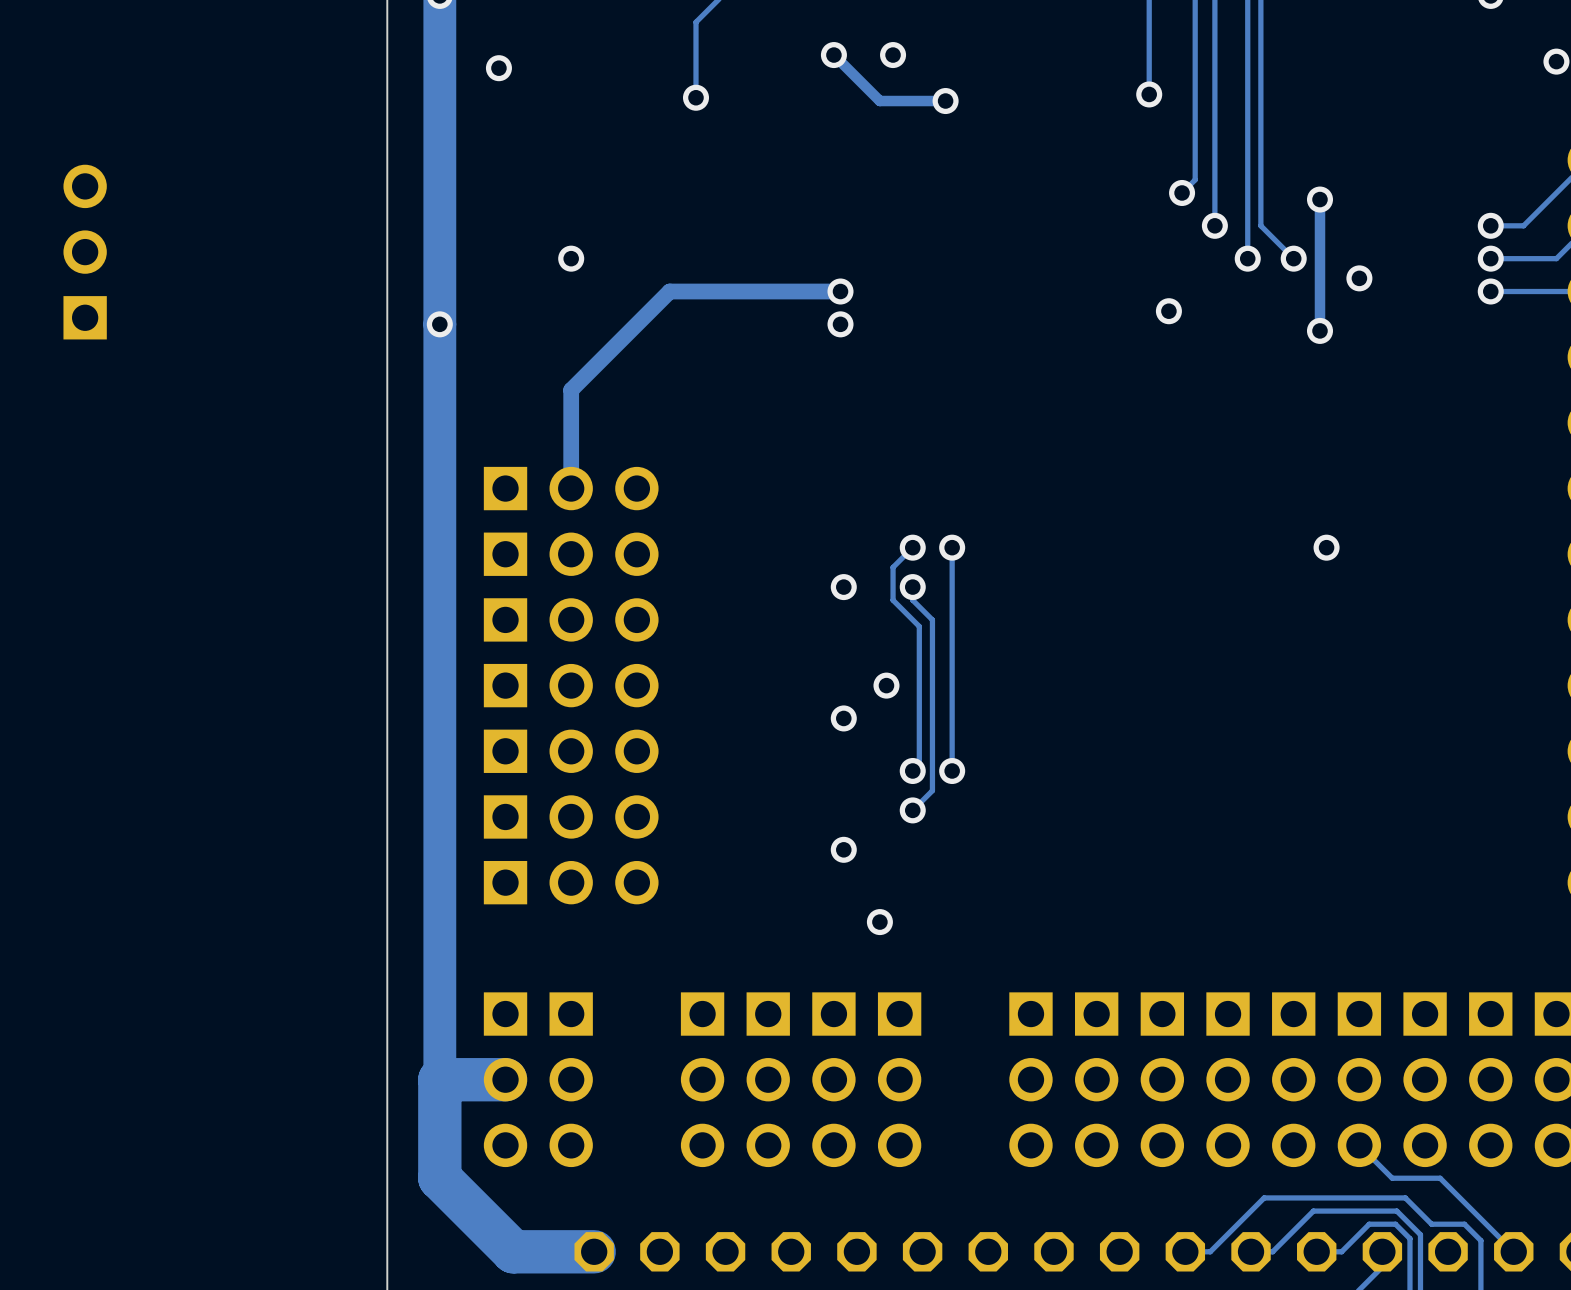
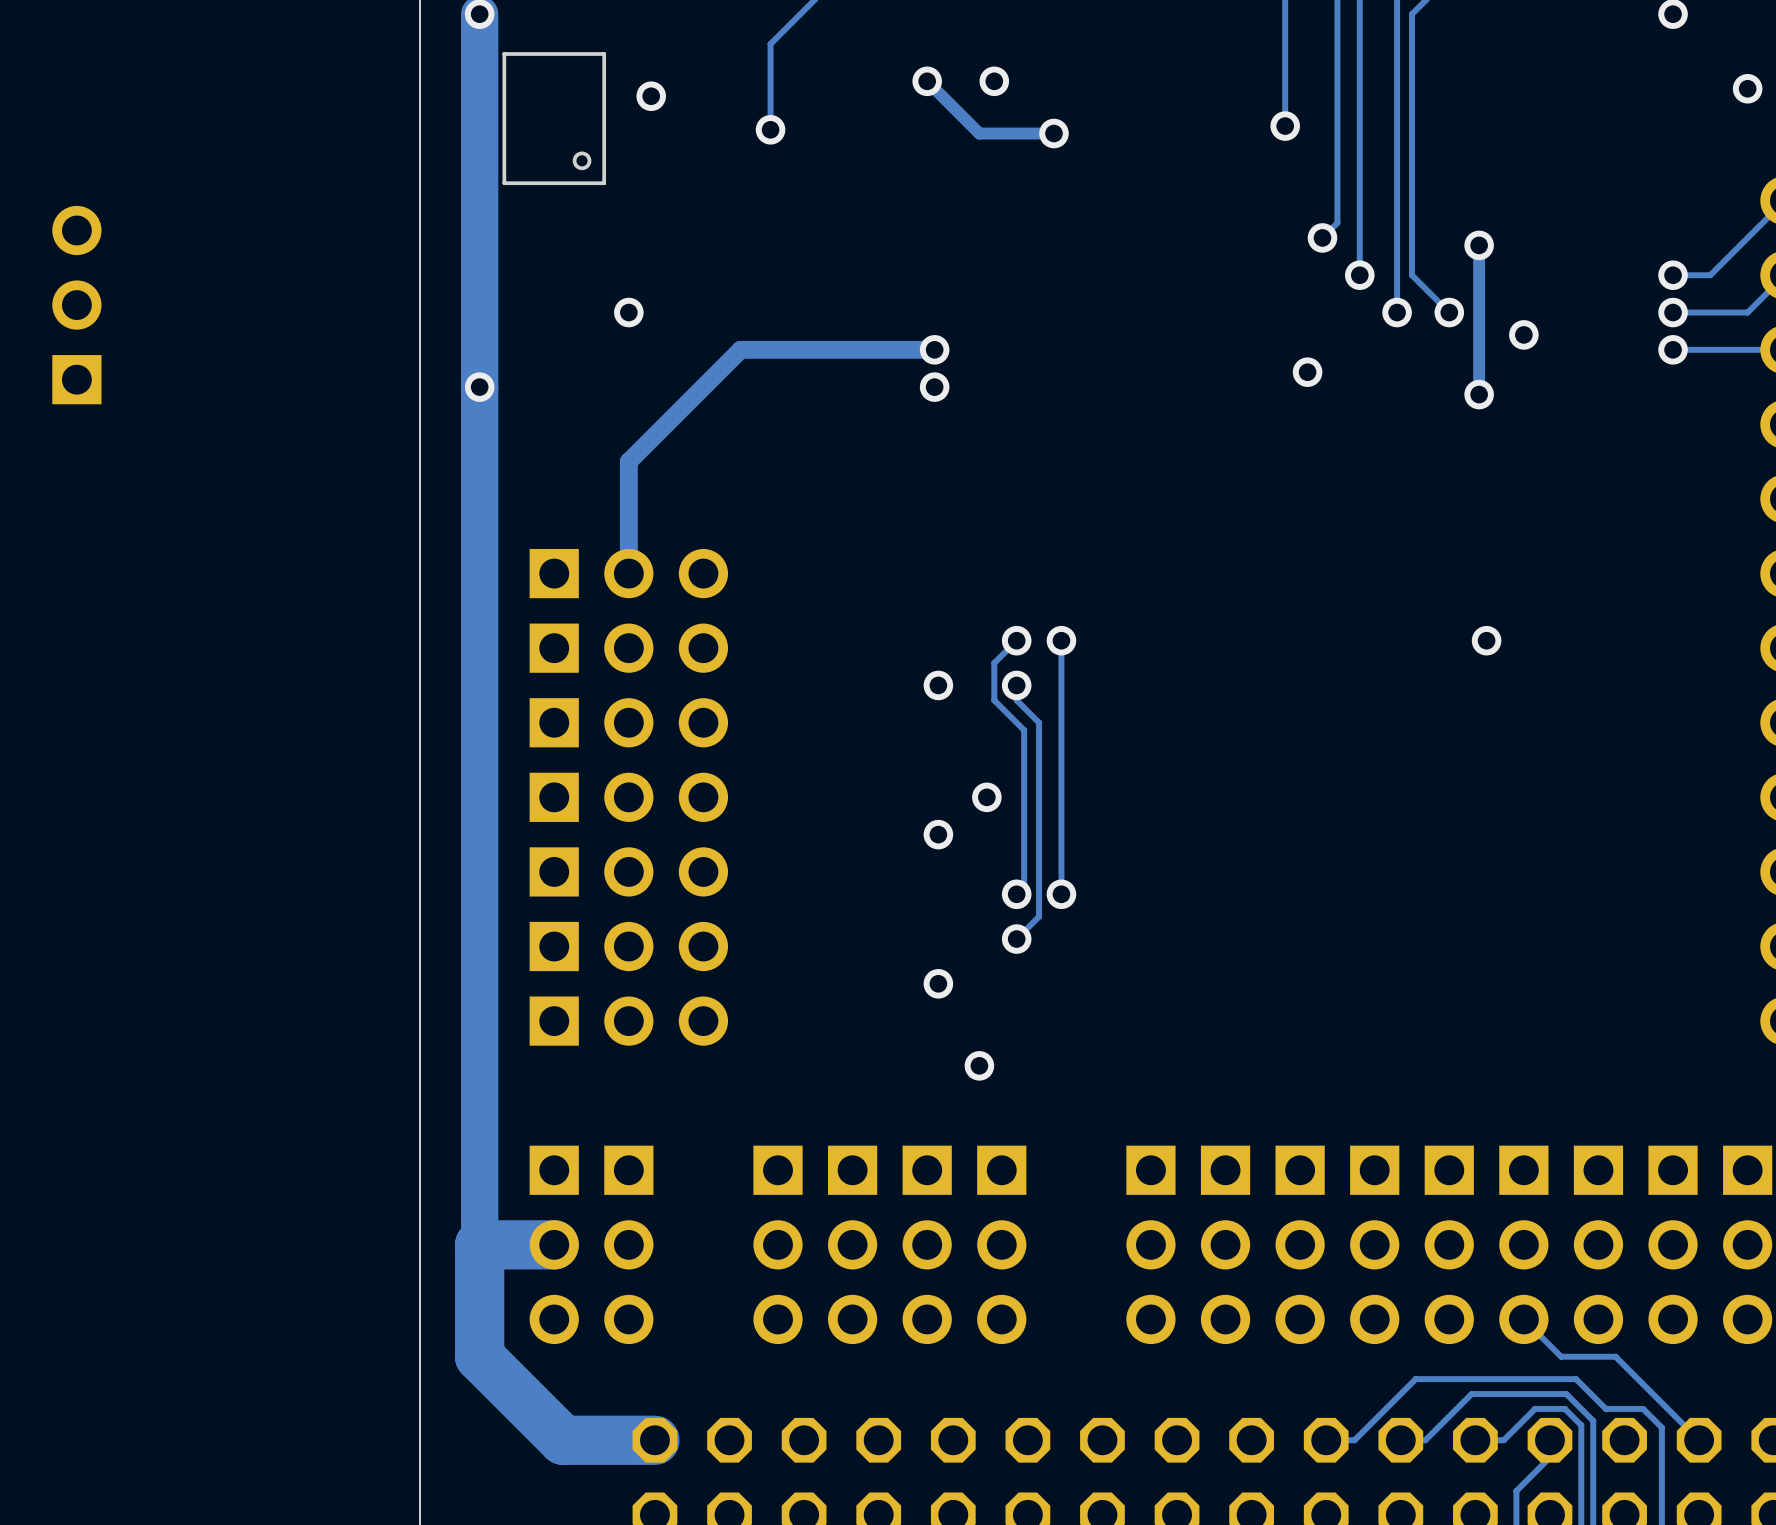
via position: (498, 68) -> (651, 96)
part: none -> (554, 118)

